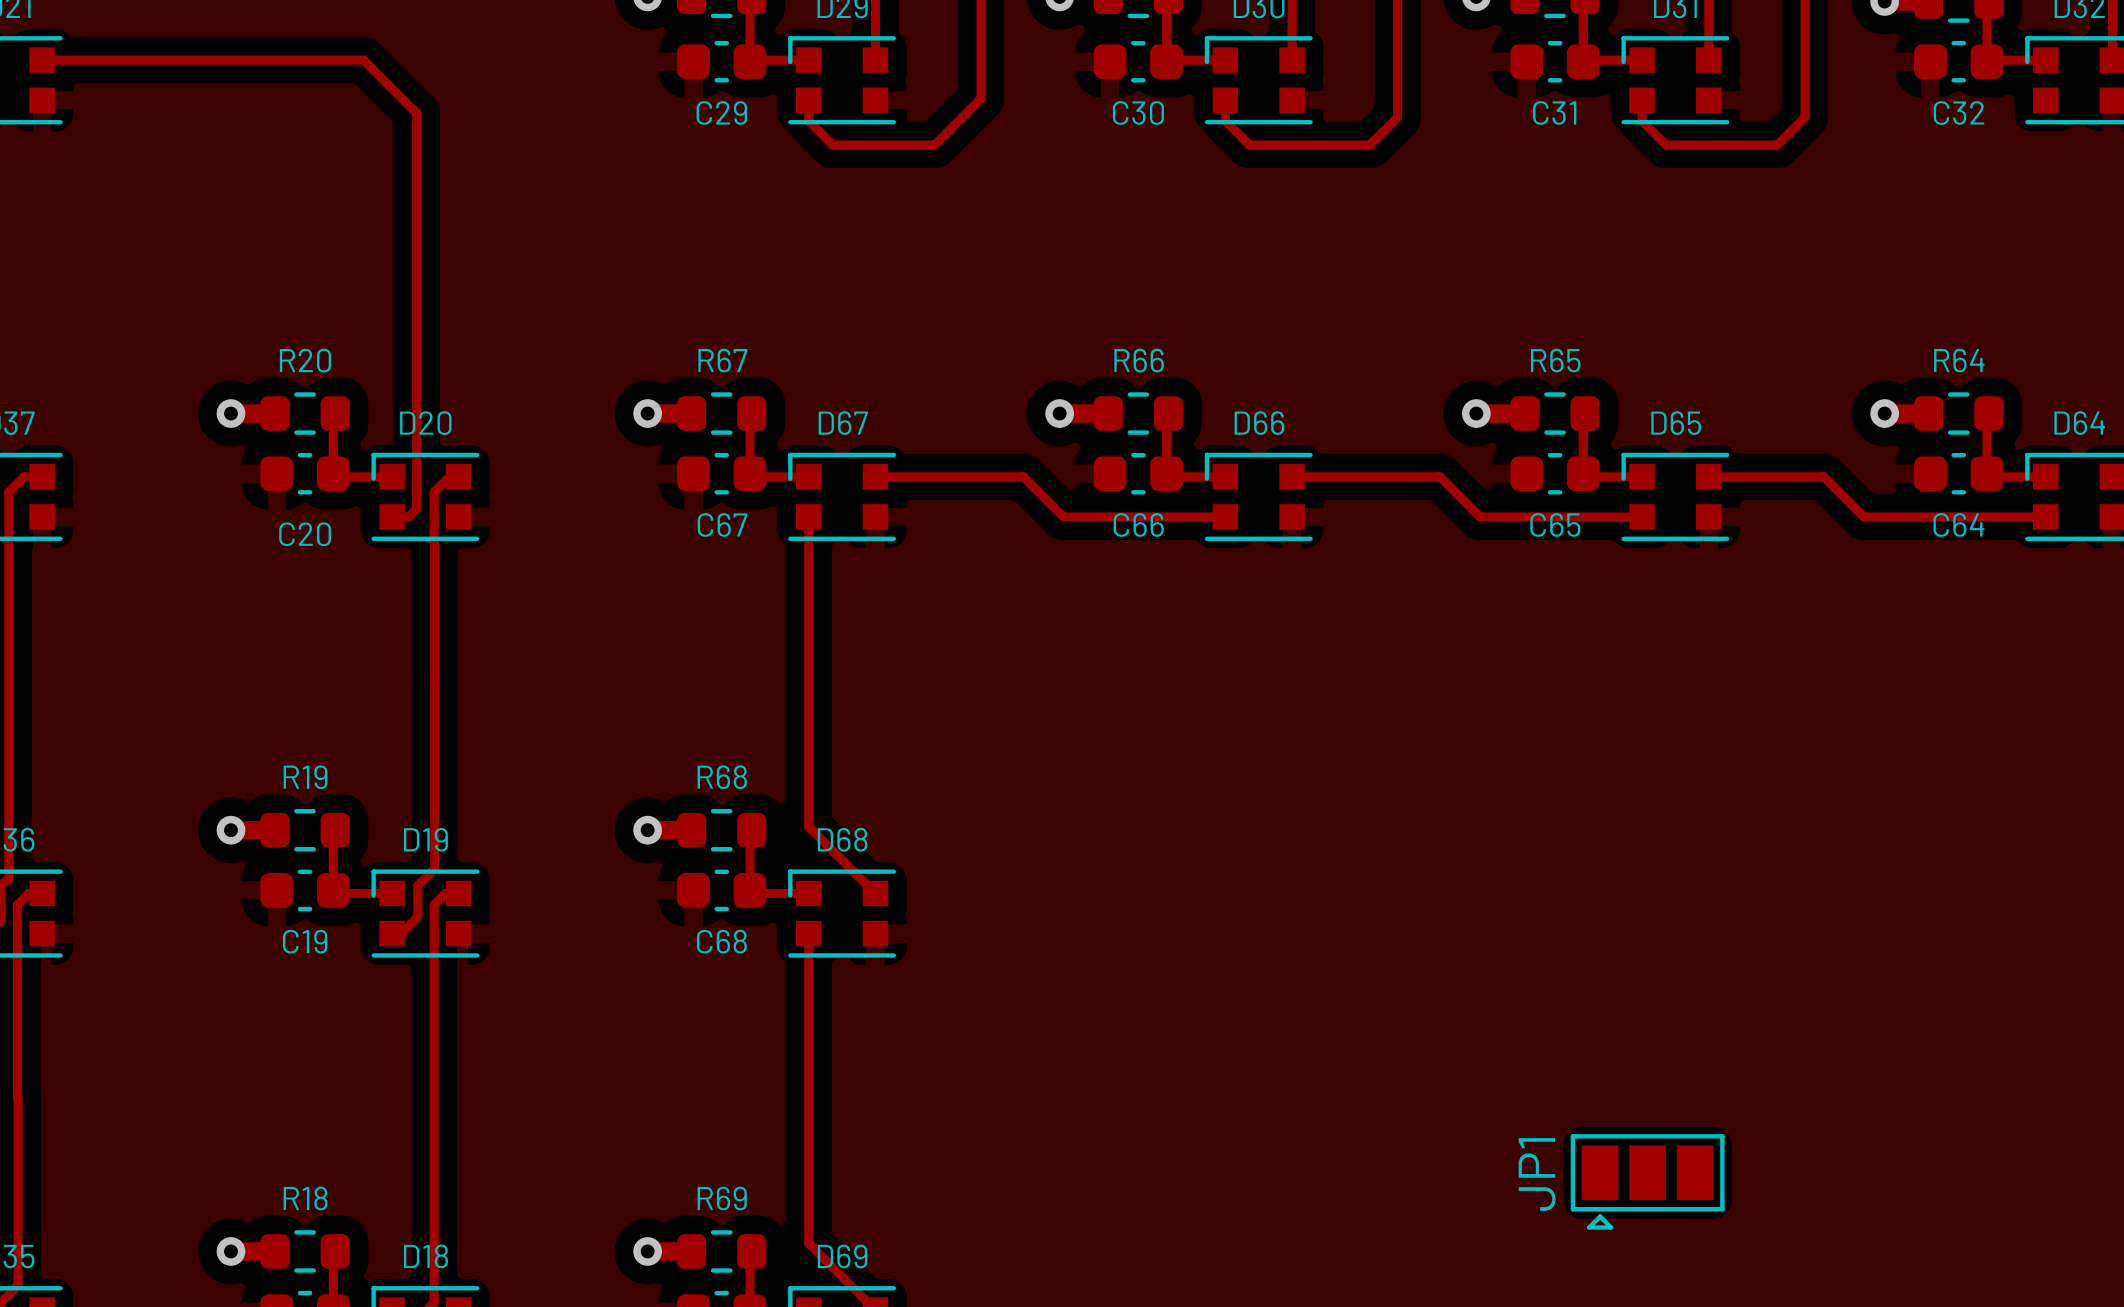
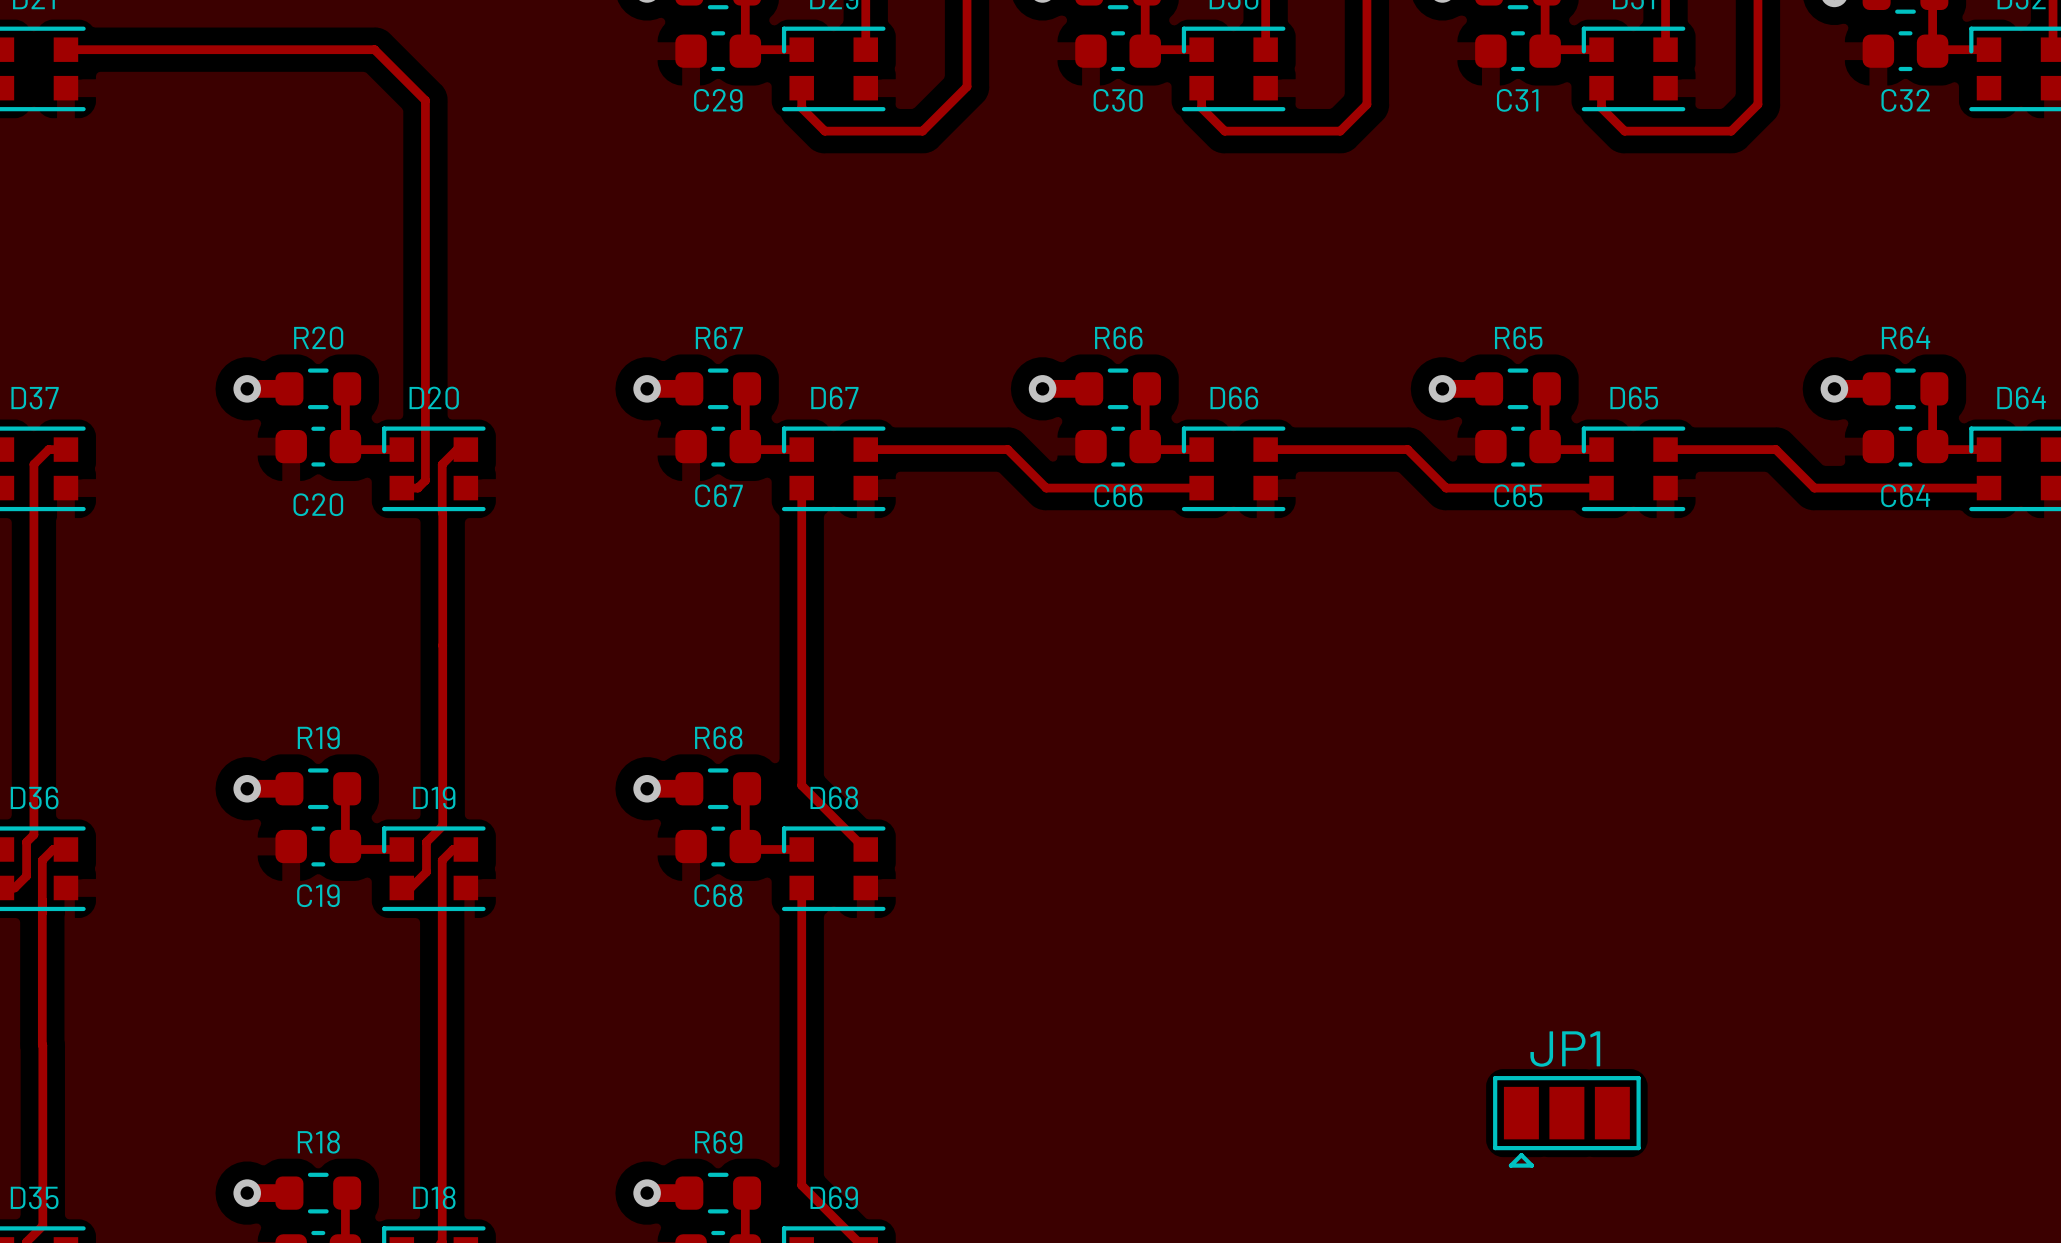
JP1 name rotation: 0° (1537, 1174) -> 90° clockwise (1565, 1049)
JP1 position: (1647, 1181) -> (1566, 1121)

